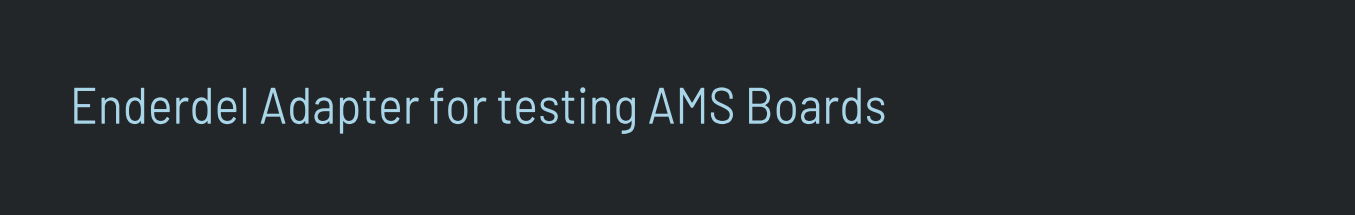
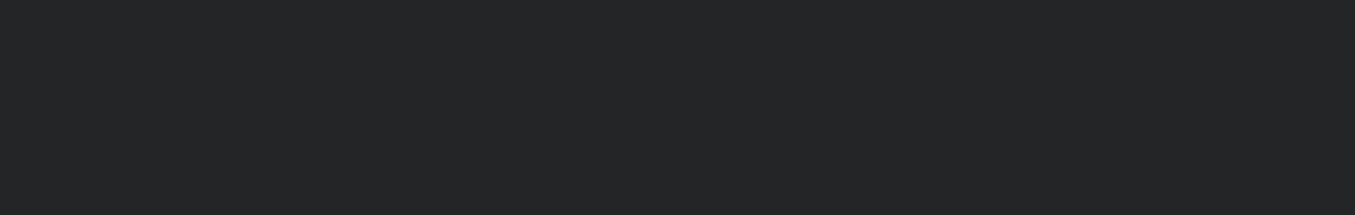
text: Enderdel Adapter for testing AMS Boards (479, 110) -> none

